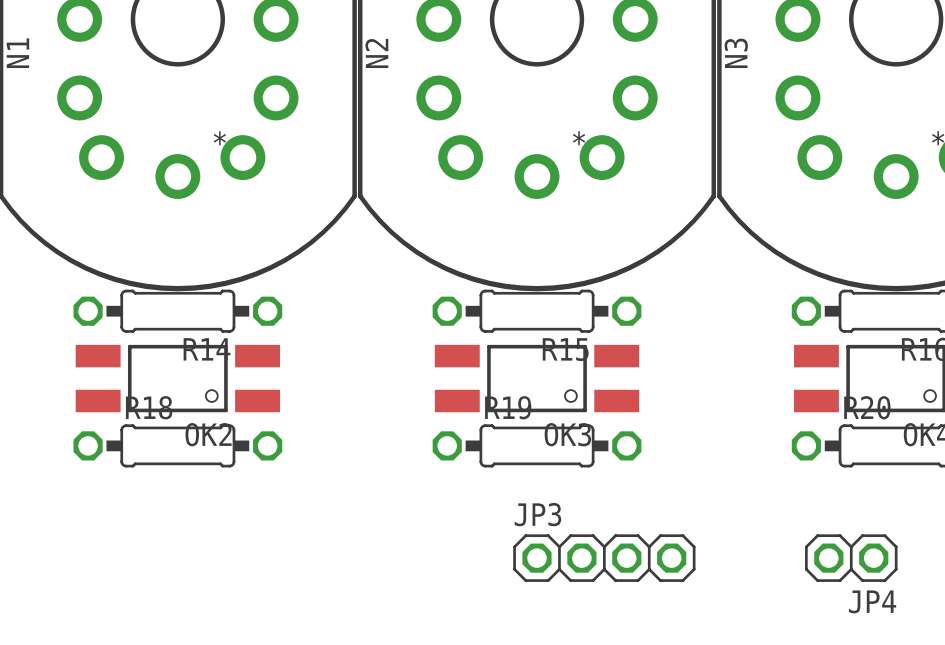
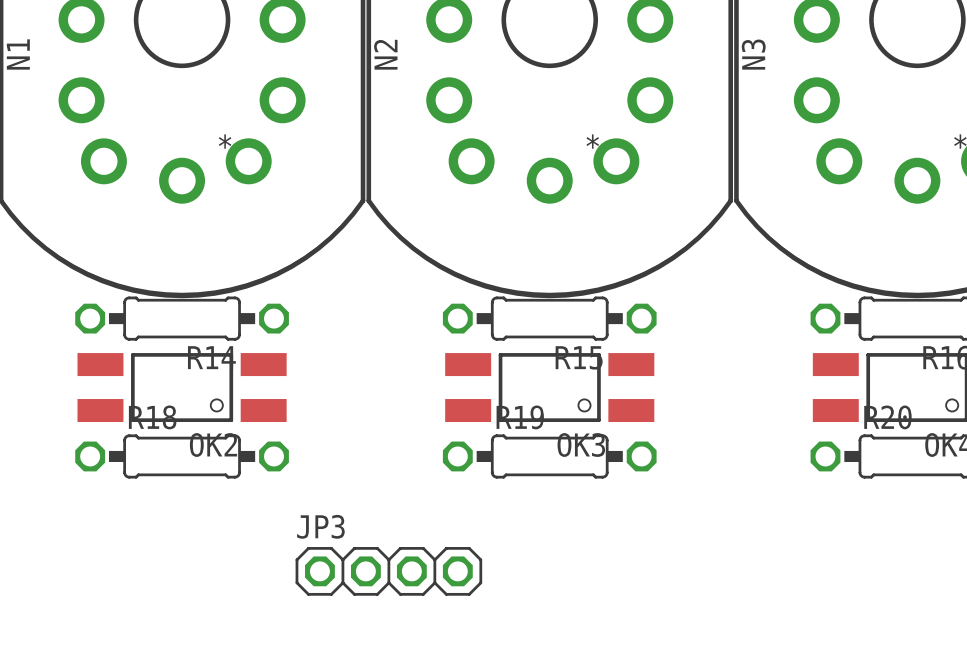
JP3 position: (604, 558) -> (388, 571)
JP4: (851, 558) -> none

